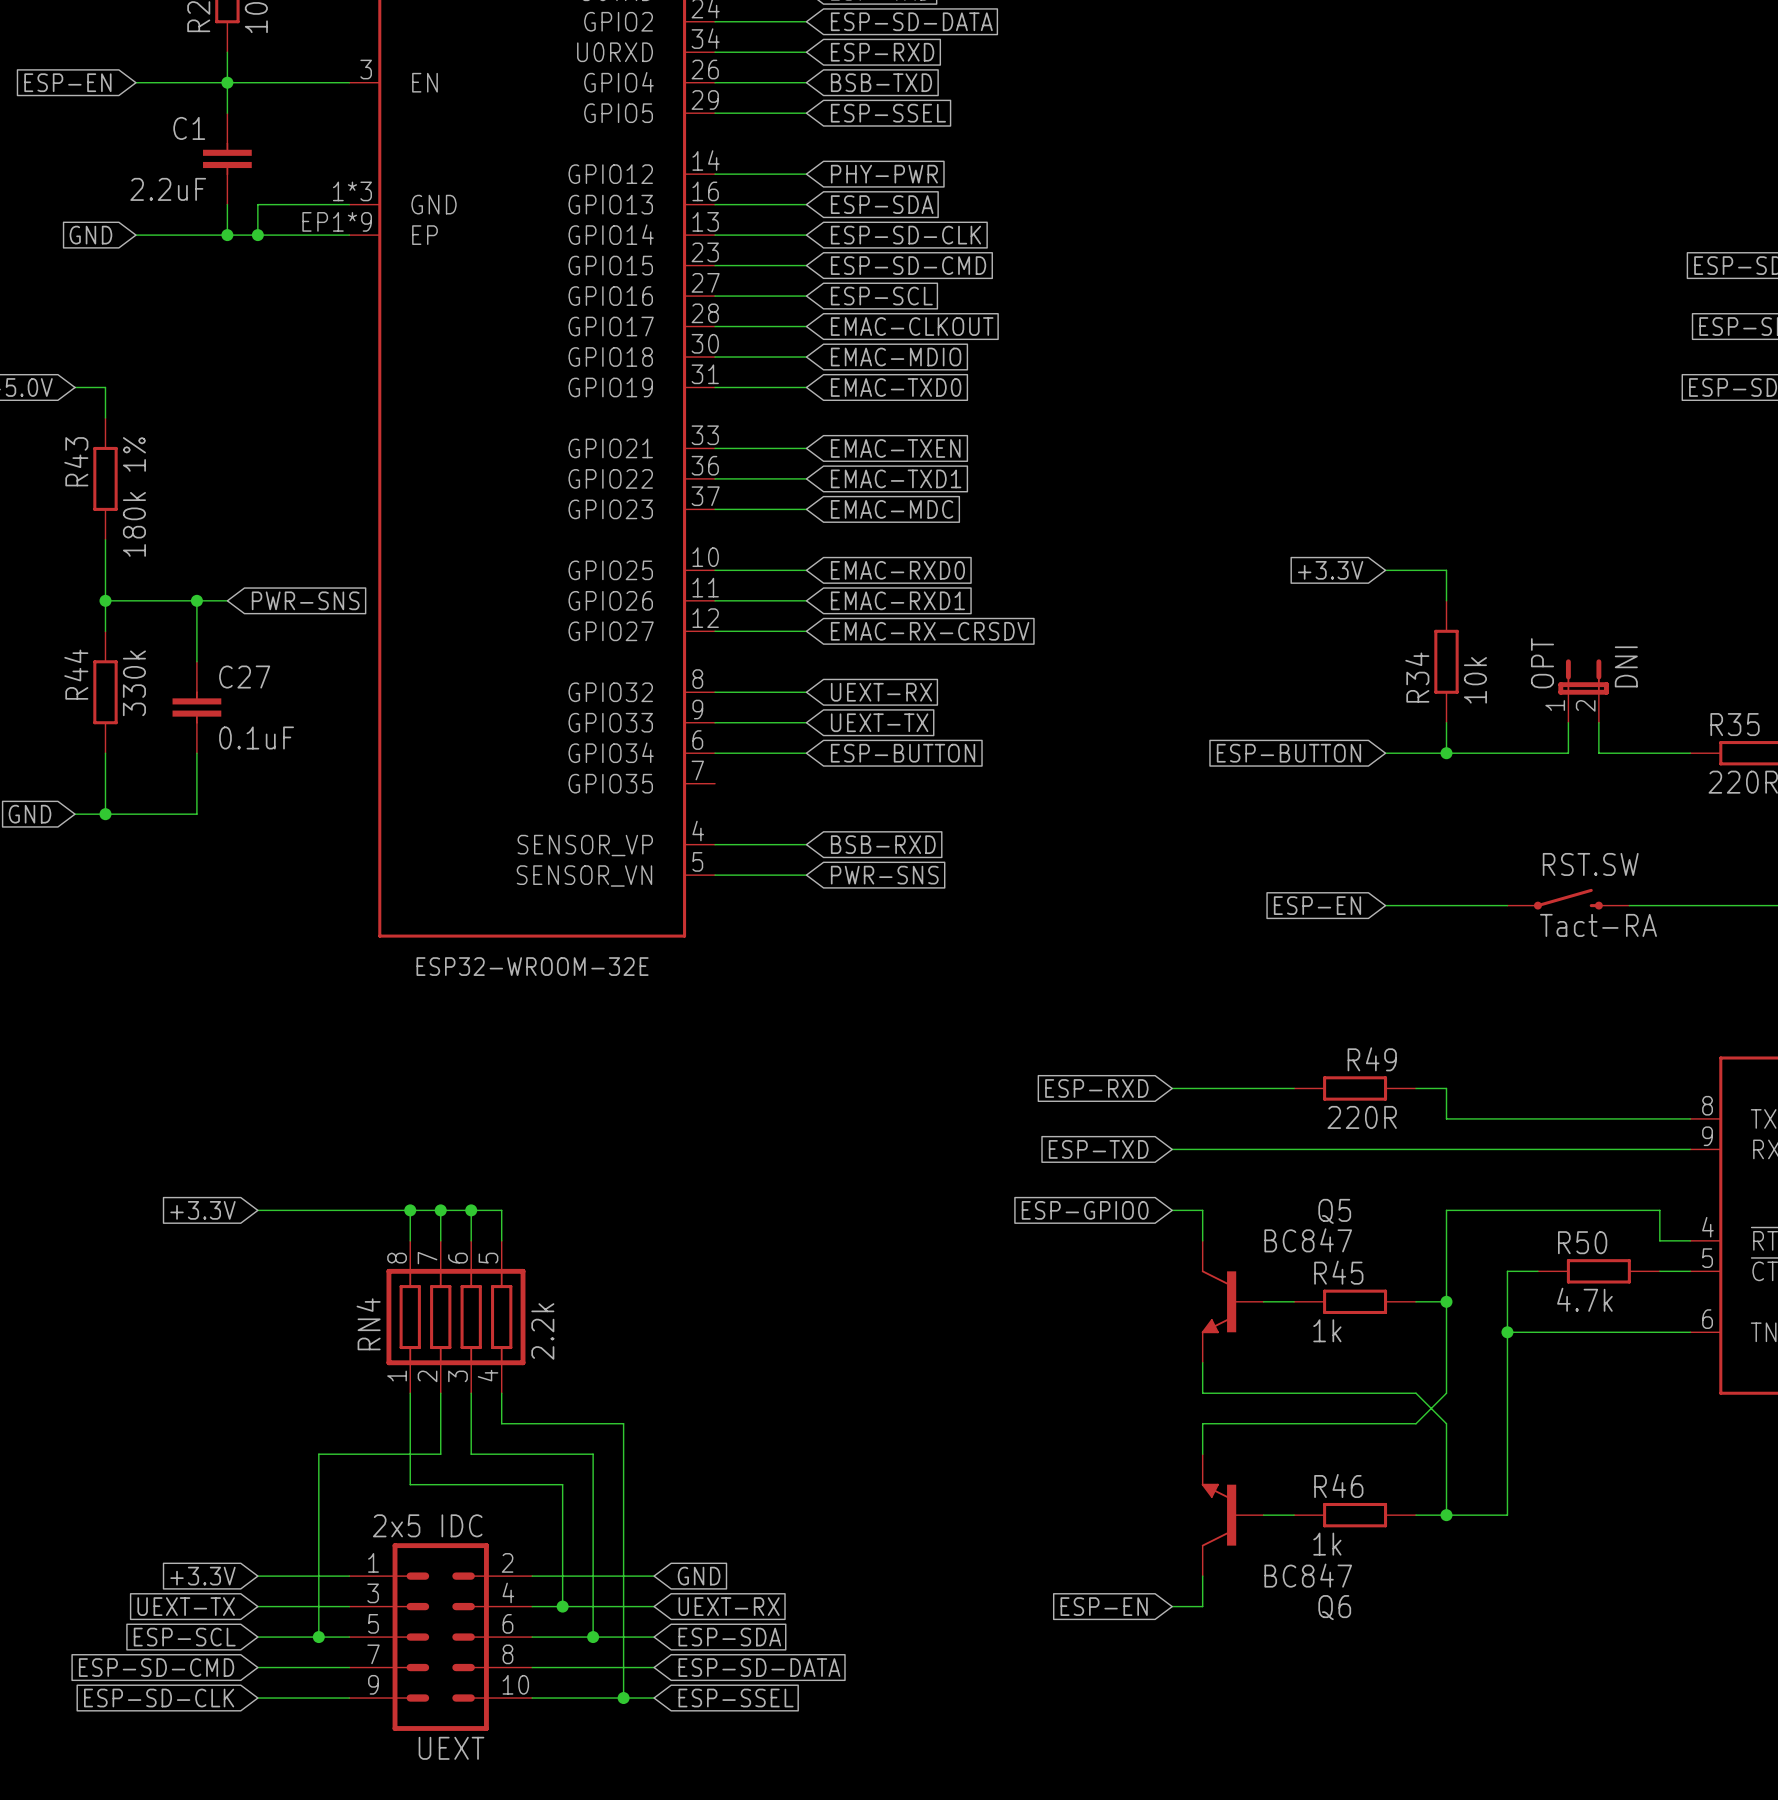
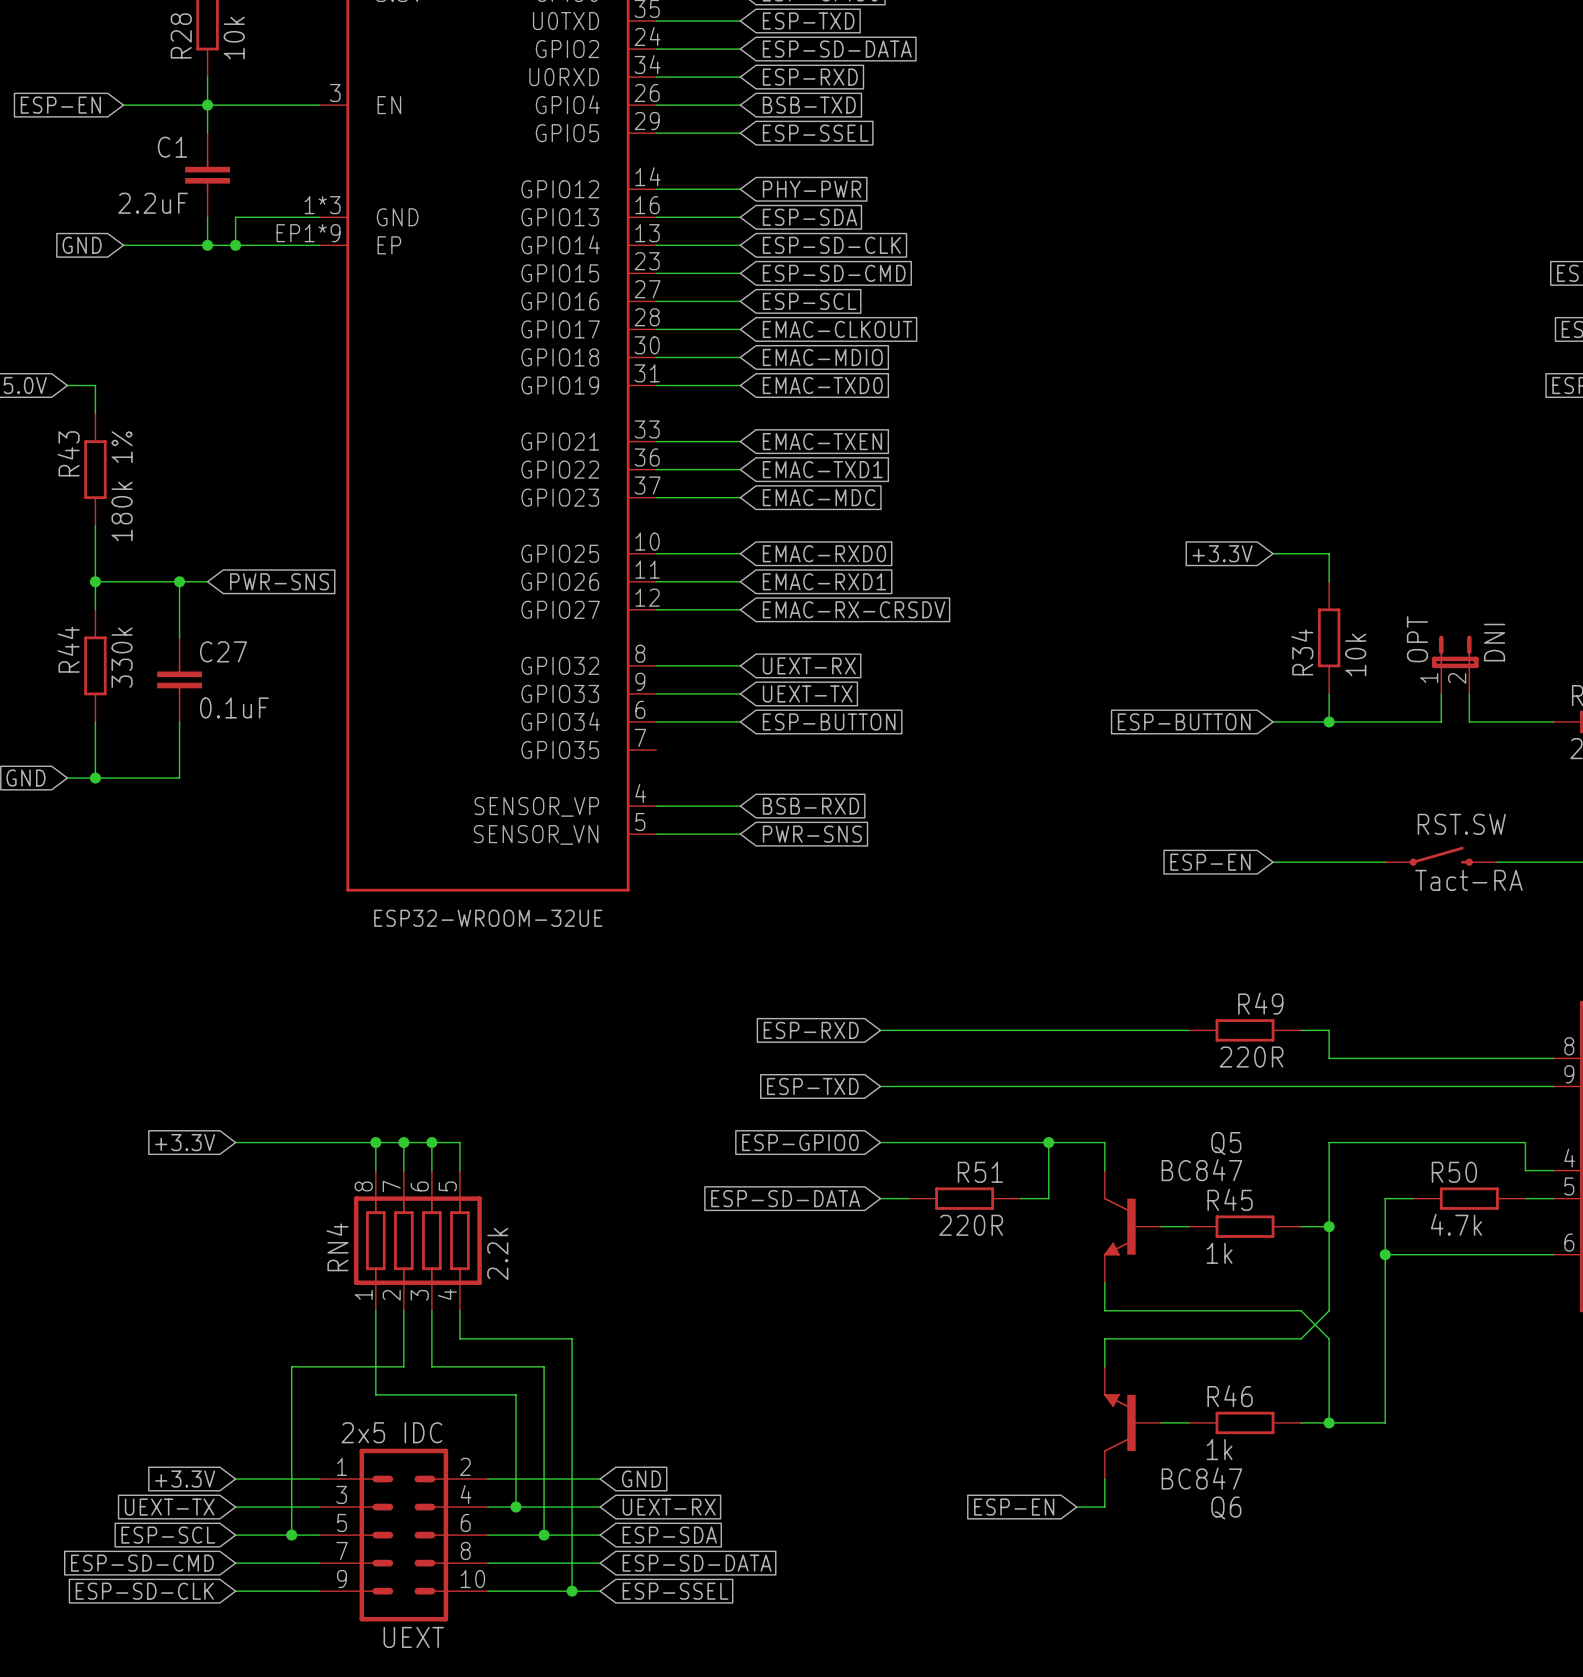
part value: ESP32-WROOM-32E (532, 966) -> ESP32-WROOM-32UE (488, 918)
wire: none -> (880, 1030) (1076, 1030)
global label position: ESP-RXD (1096, 1088) -> ESP-RXD (811, 1030)
wire: none -> (880, 1086) (1076, 1086)
global label position: ESP-TXD (1098, 1149) -> ESP-TXD (812, 1086)
wire: none -> (880, 1142) (1076, 1142)
global label position: ESP-GPIO0 (1085, 1210) -> ESP-GPIO0 (800, 1142)
wire: none -> (1048, 1142) (1048, 1198) (1020, 1198)
junction: none -> (1048, 1142)
global label: none -> ESP-SD-DATA (785, 1198)
wire: none -> (880, 1198) (908, 1198)
R51: none -> 220R (964, 1198)

